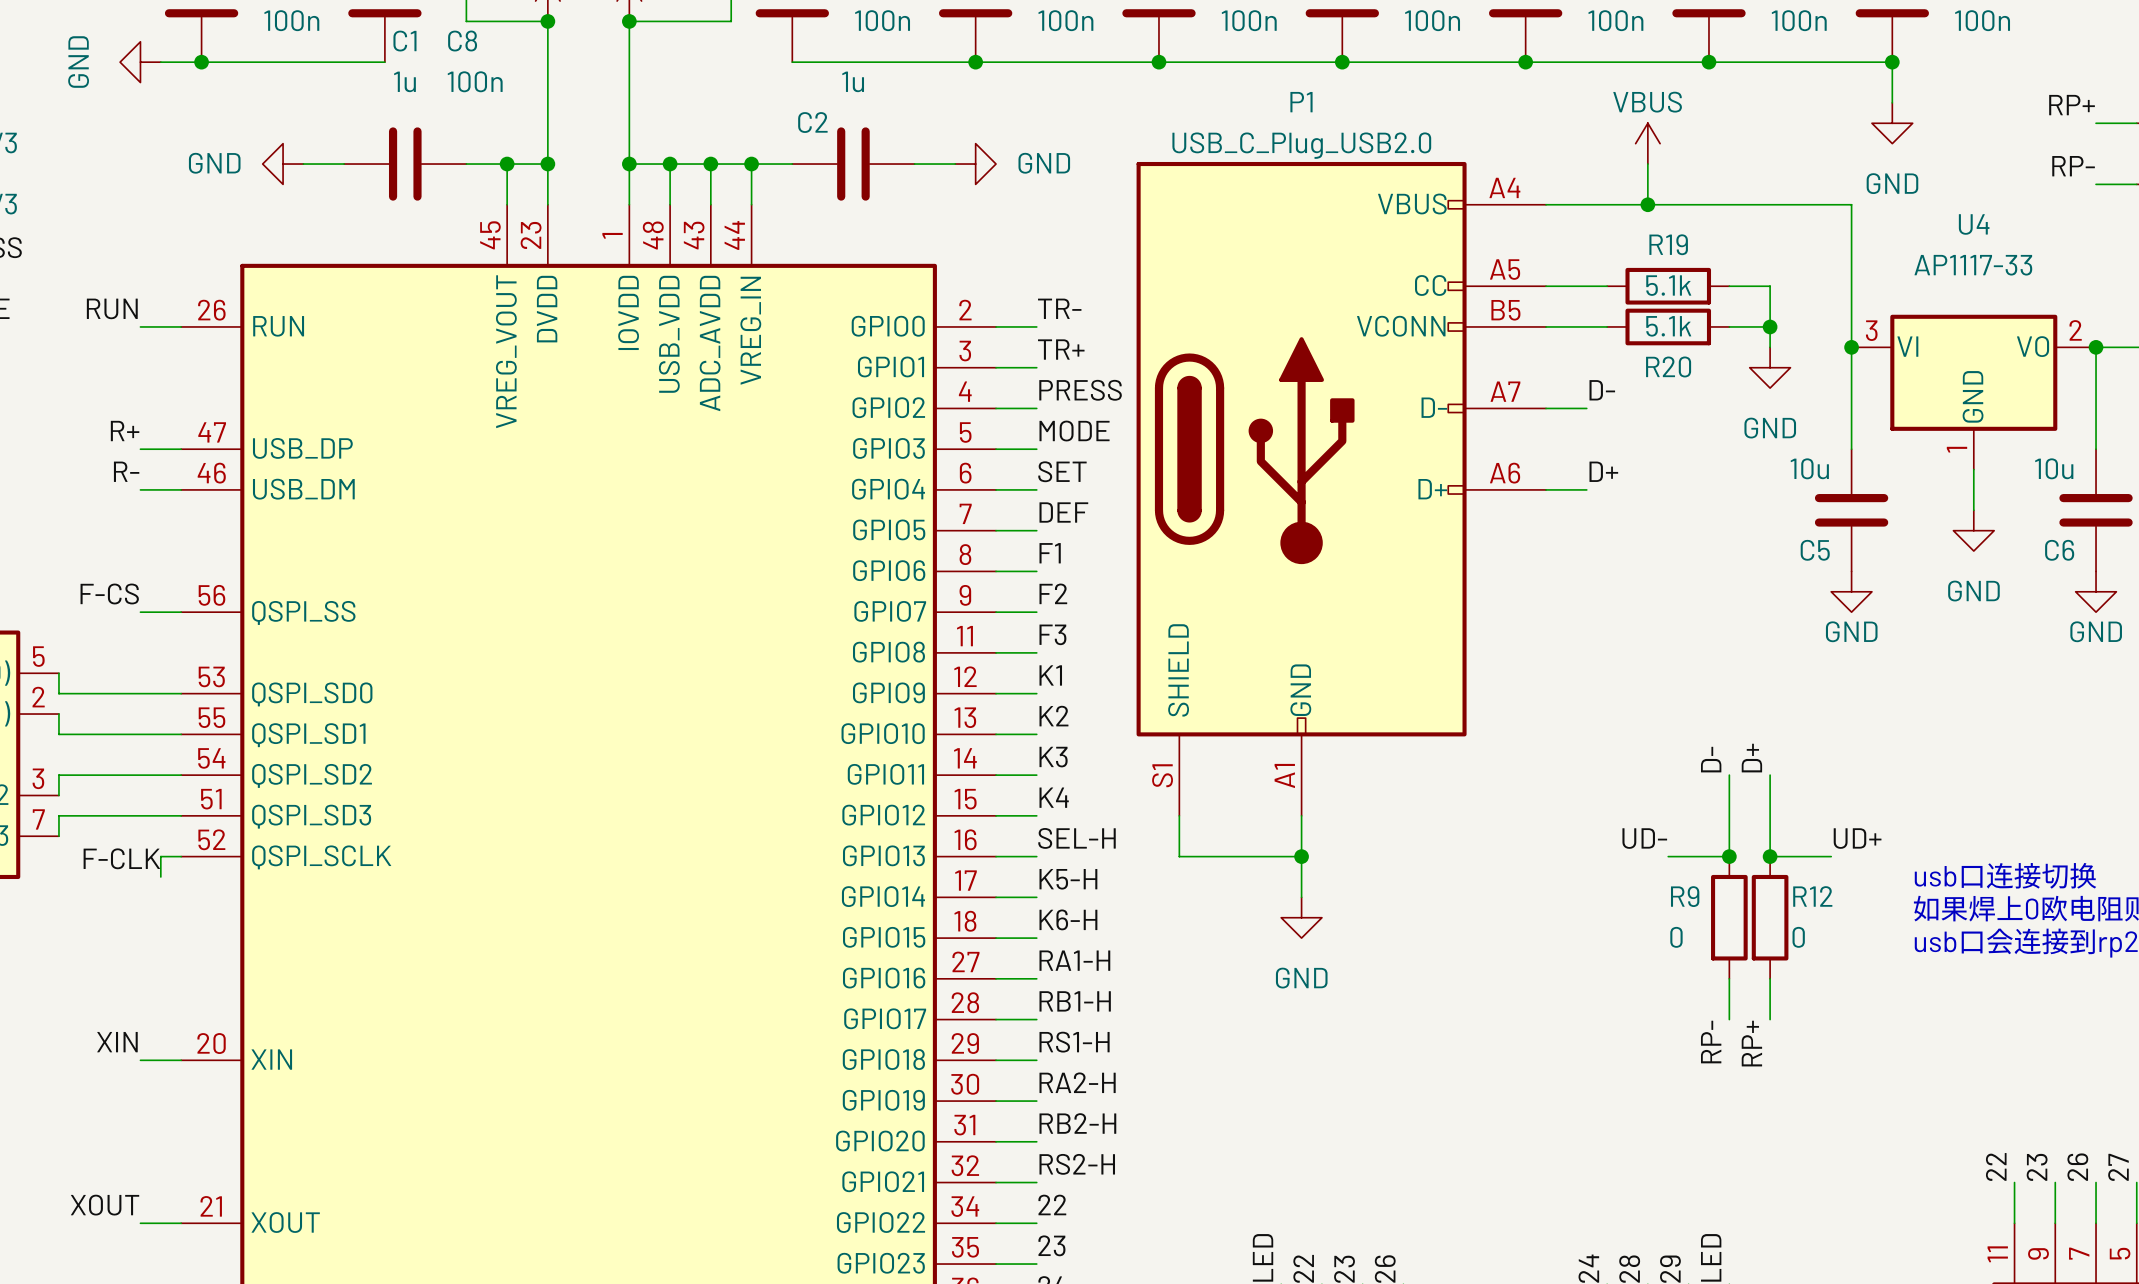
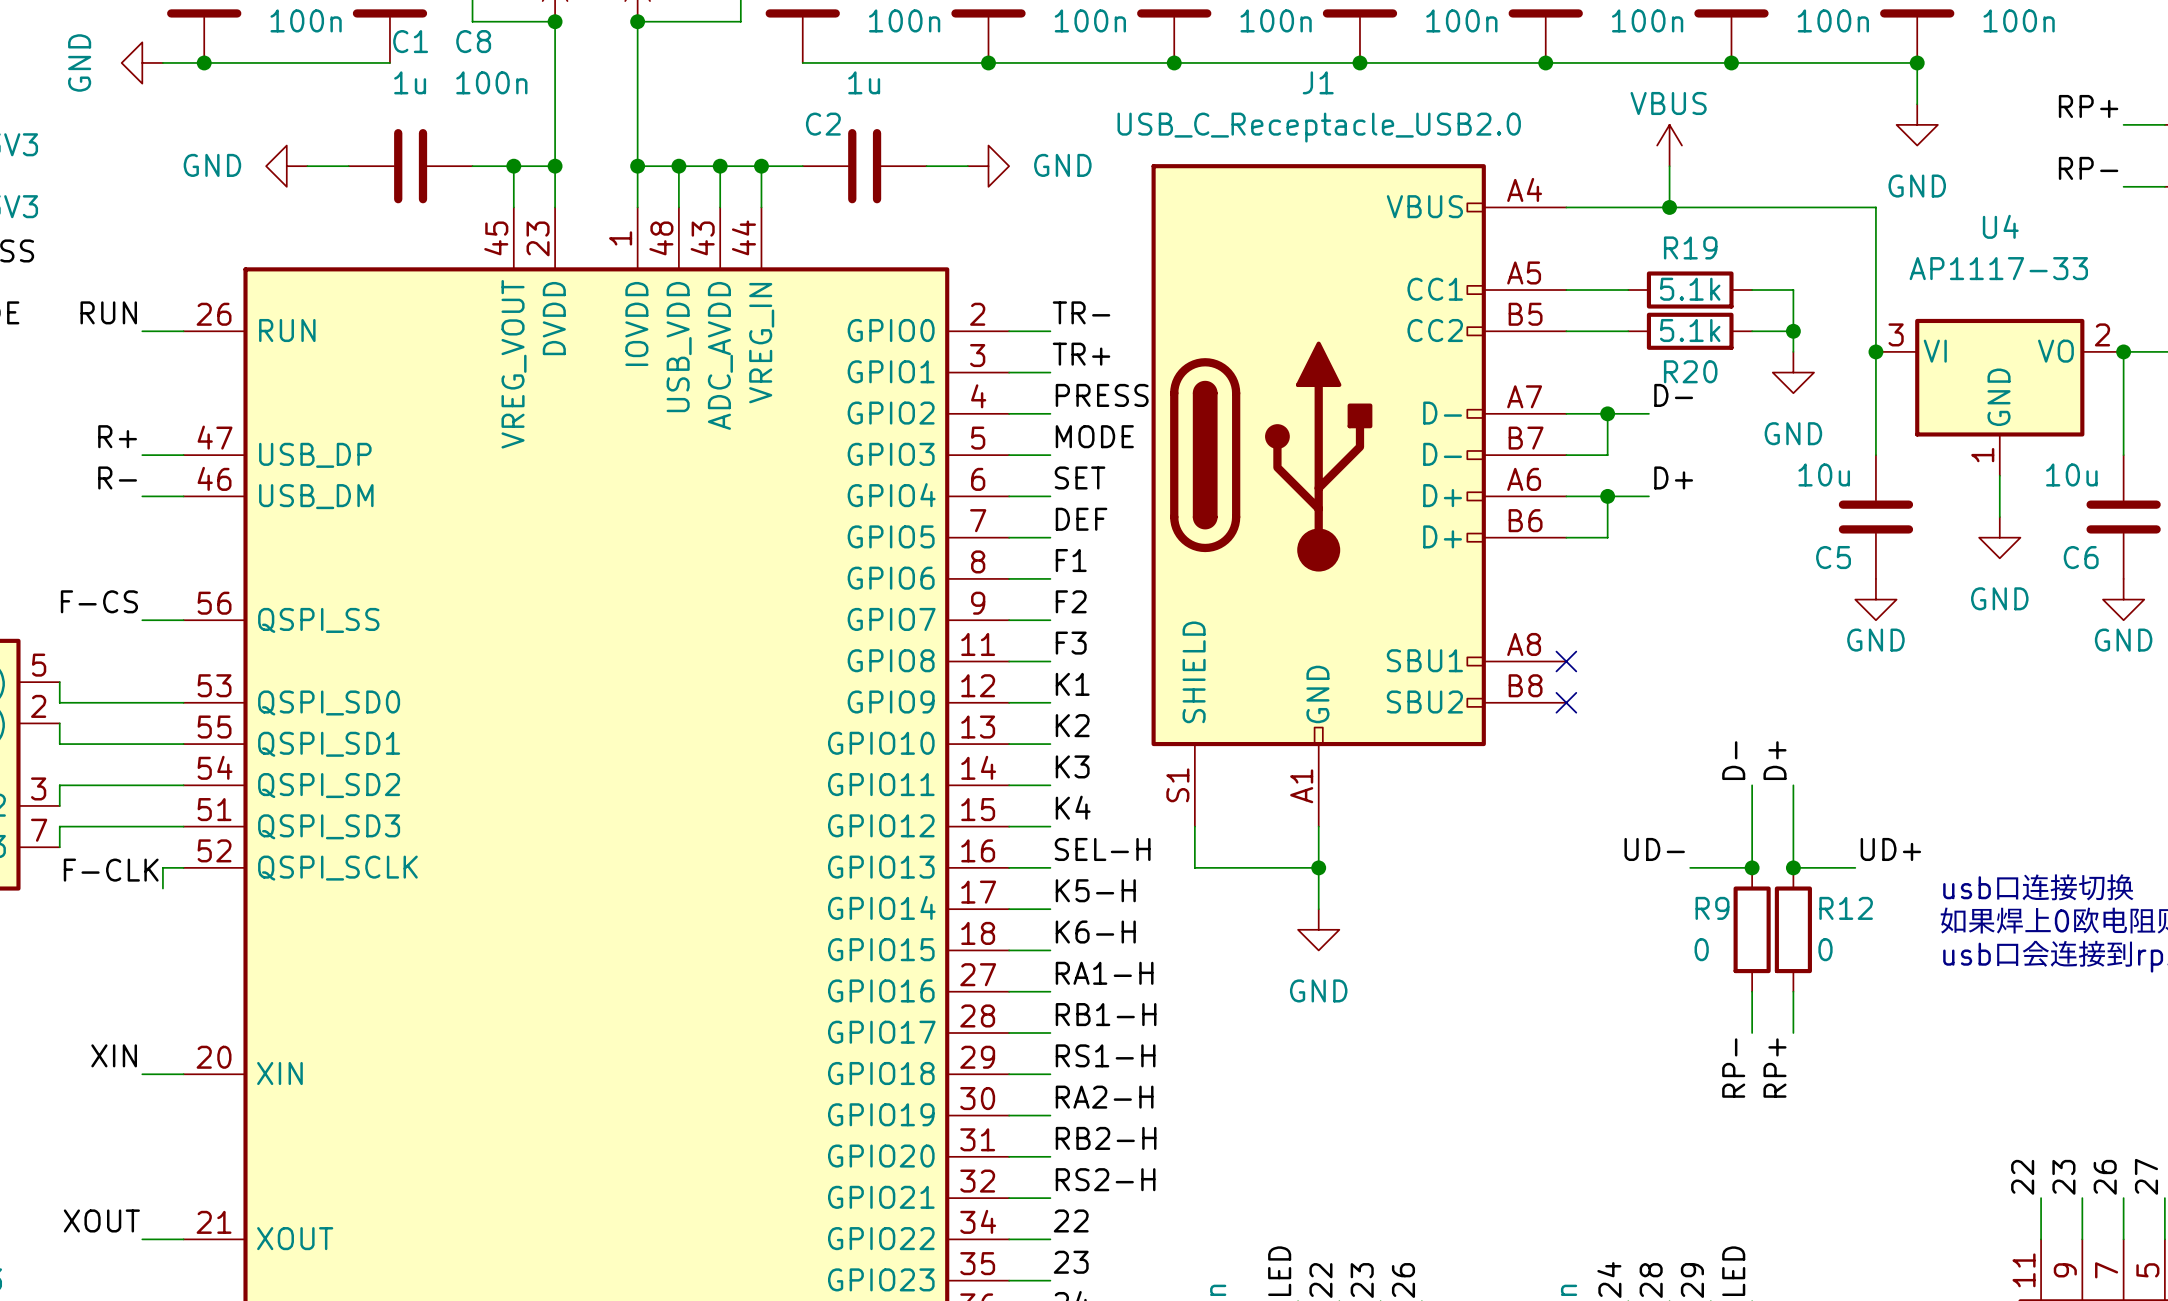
label position: D- (1602, 390) -> D- (1673, 395)
junction: none -> (1607, 413)
wire: none -> (1648, 413) (1607, 413) (1607, 455) (1566, 455)
label position: D+ (1603, 471) -> D+ (1673, 477)
P1: USB_C_Plug_USB2.0 (1341, 488) -> none
J1: none -> USB_C_Receptacle_USB2.0 (1358, 495)
junction: none -> (1607, 496)
wire: none -> (1648, 496) (1607, 496) (1607, 537) (1566, 537)
no-connect mark: none -> (1566, 661)
no-connect mark: none -> (1566, 702)

